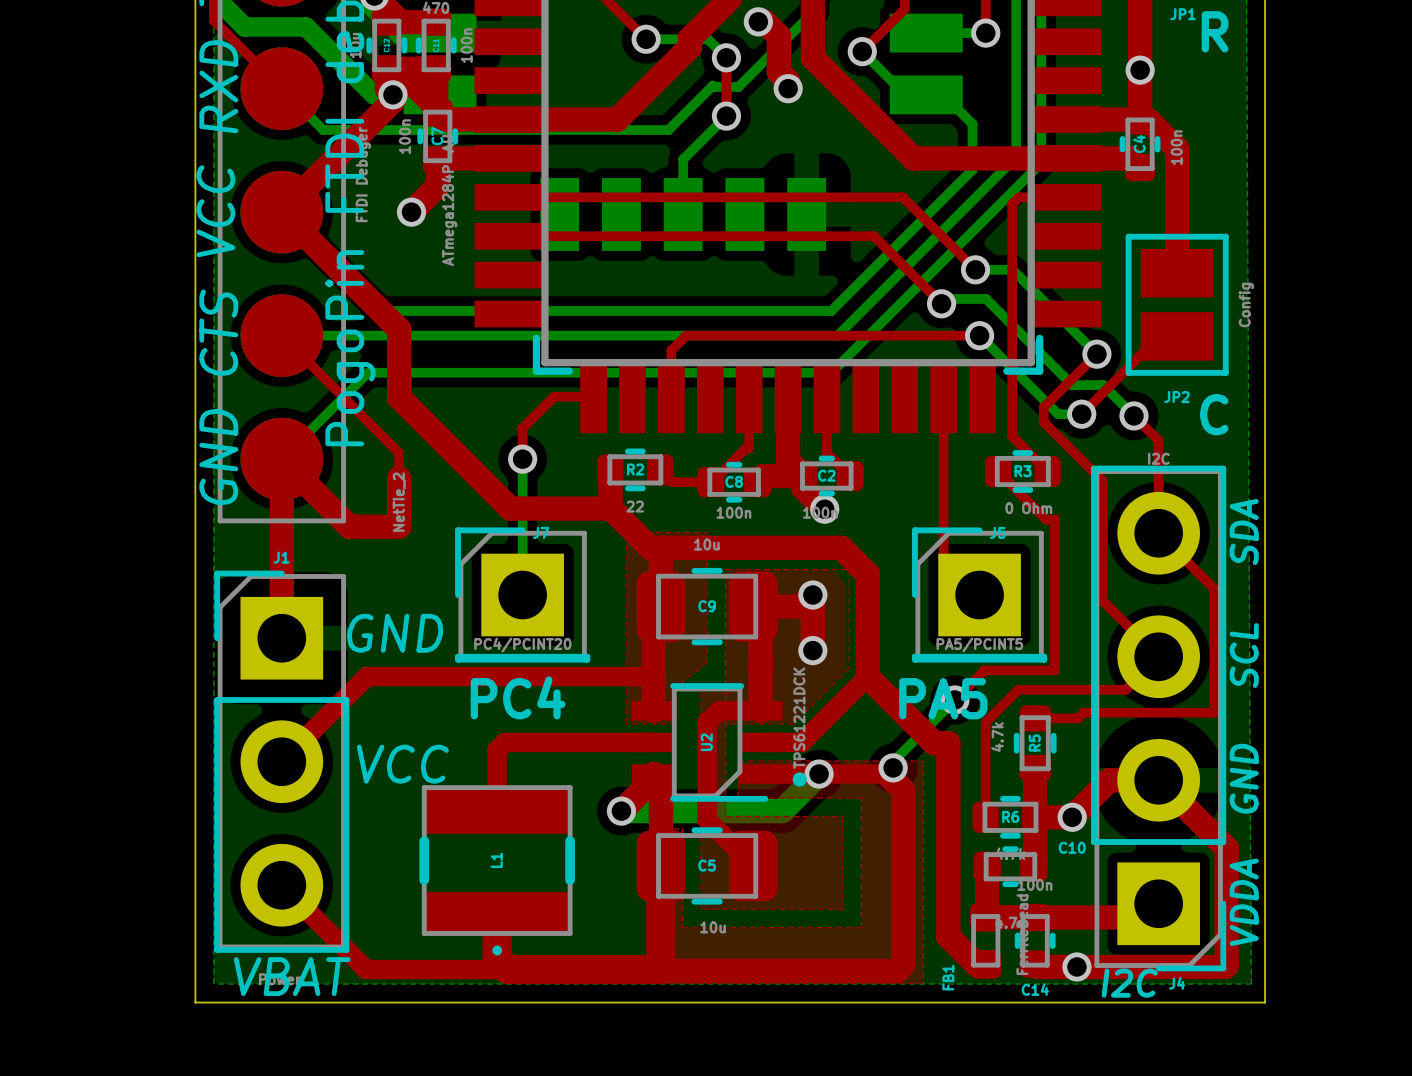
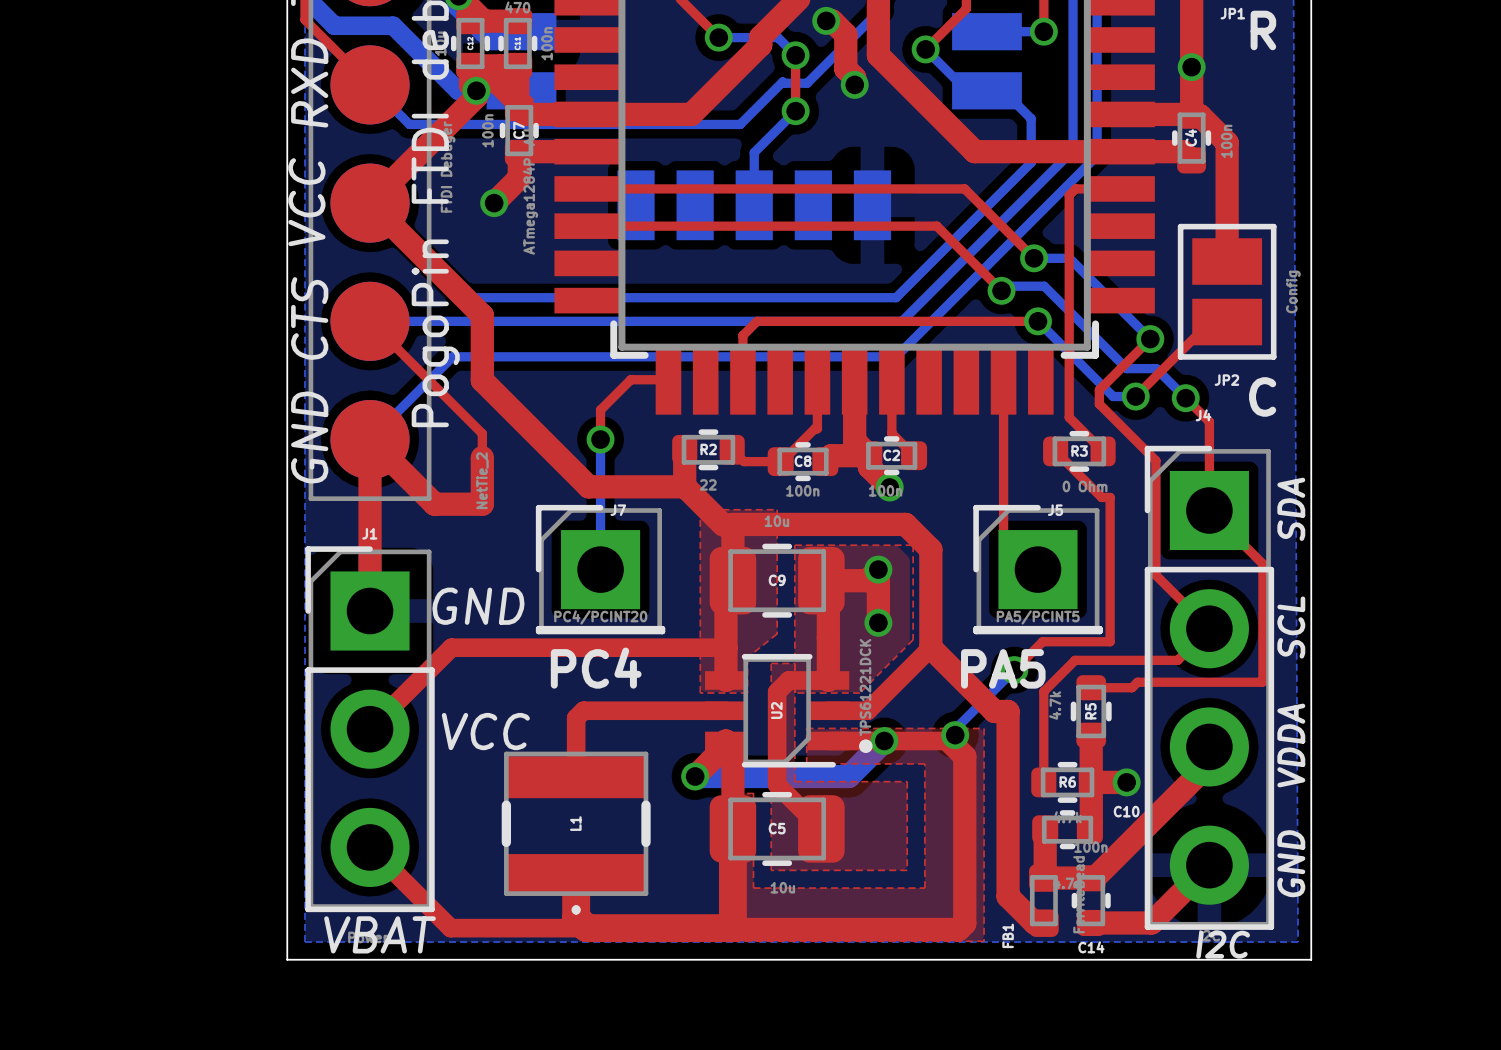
J4 rotation: 0° (1158, 718) -> 180° (1209, 687)
text: GND (1244, 778) -> VDDA (1291, 745)
top track: none -> (1209, 763) (1094, 878)
top track: (1072, 817) (1109, 780) (1158, 780) (1226, 848) (1226, 965) (1037, 966) (1035, 964) -> none
text: VDDA (1244, 902) -> GND (1291, 863)
top track: (1038, 917) (1144, 917) -> (1091, 922) (1151, 922) (1196, 878)
via: (1076, 966) -> none
text position: I2C (1129, 983) -> I2C (1223, 944)

